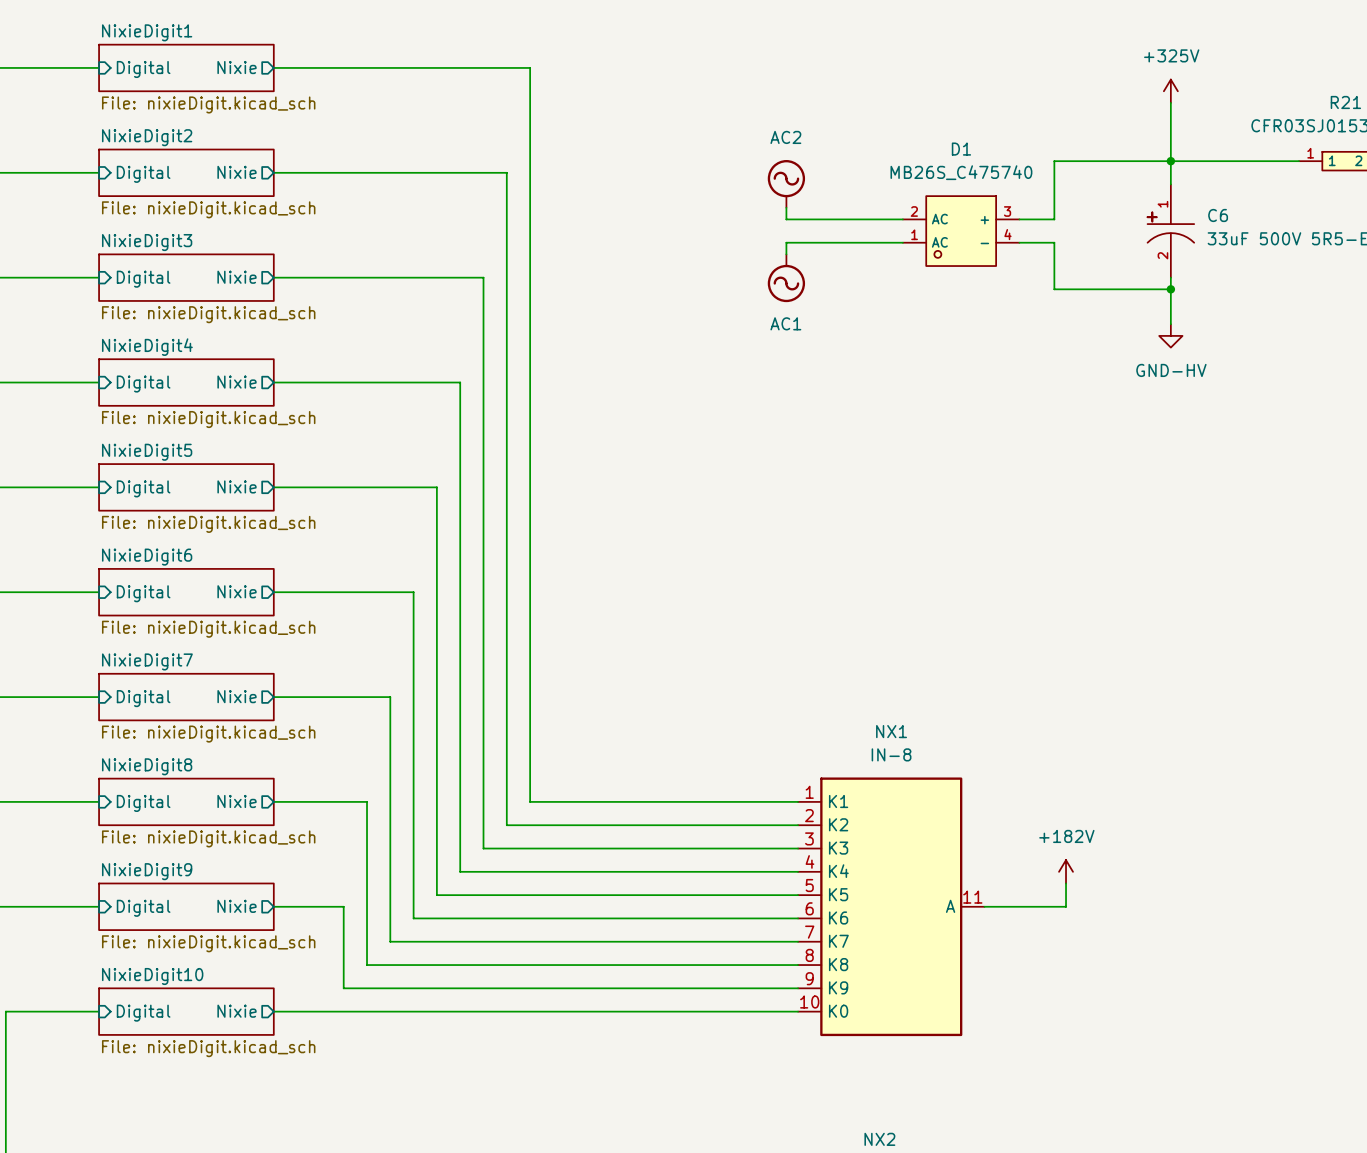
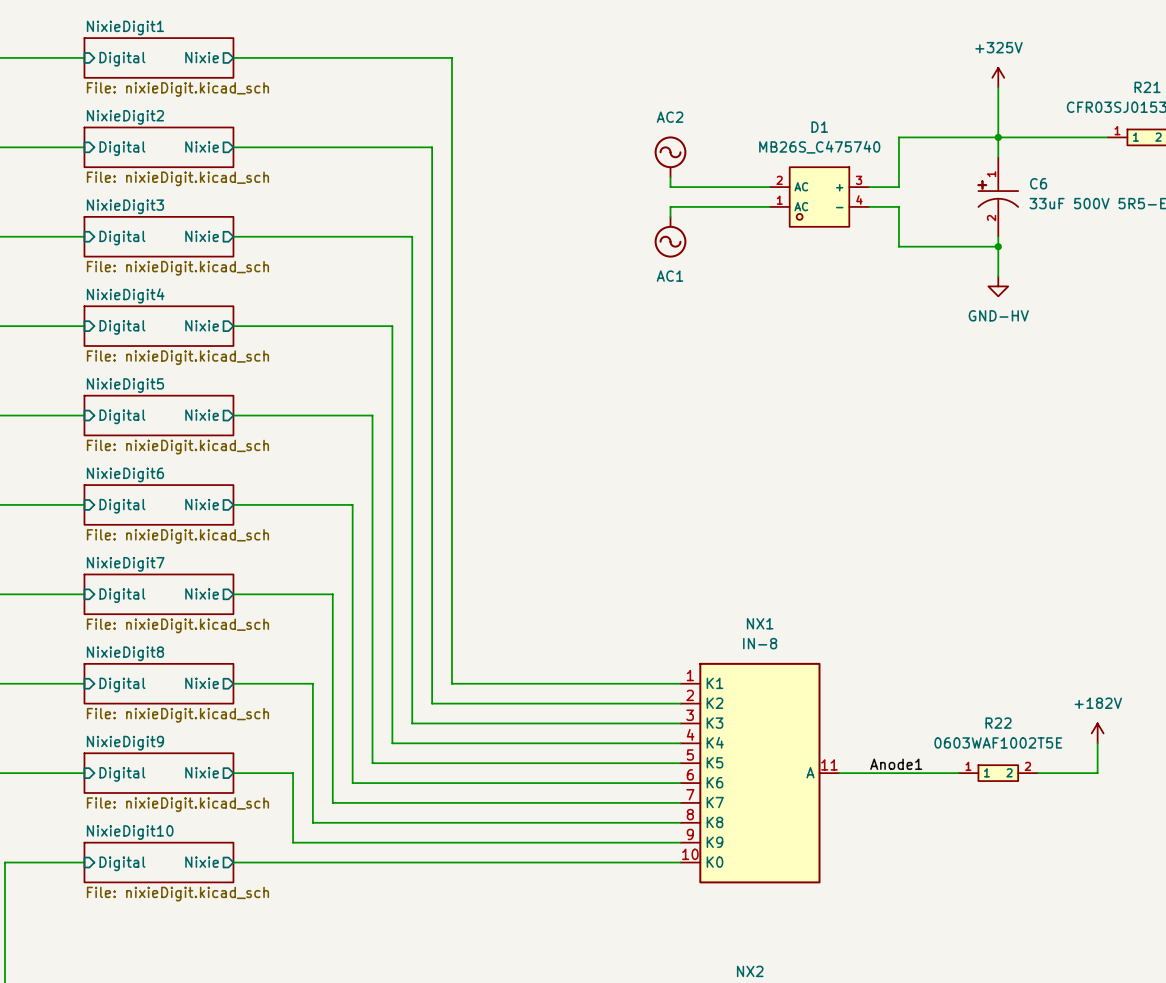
power symbol position: +182V (1066, 871) -> +182V (1097, 733)
wire: none -> (1097, 743) (1097, 773) (1038, 773)
wire: (1066, 883) (1066, 906) -> (958, 773) (908, 773)
label: none -> Anode1 (896, 764)
R22: none -> 0603WAF1002T5E (998, 773)

